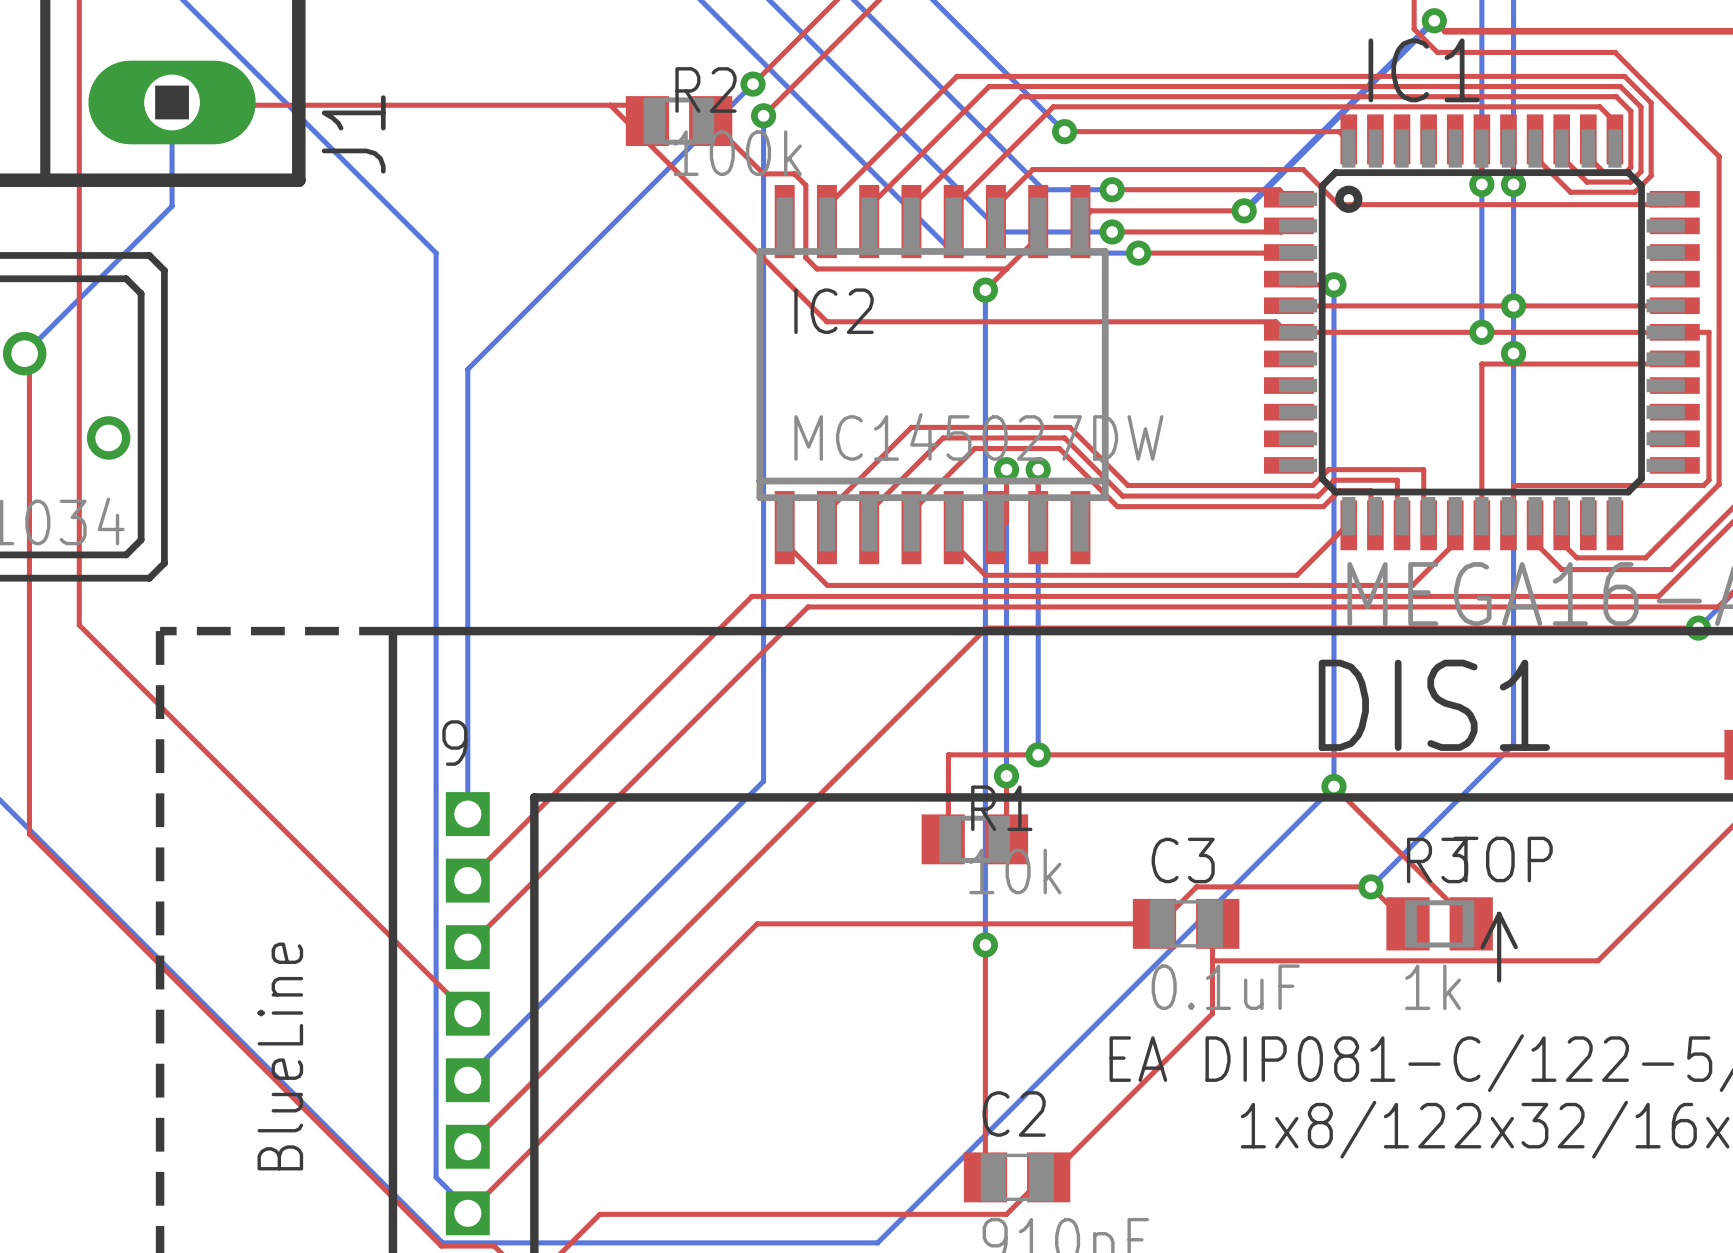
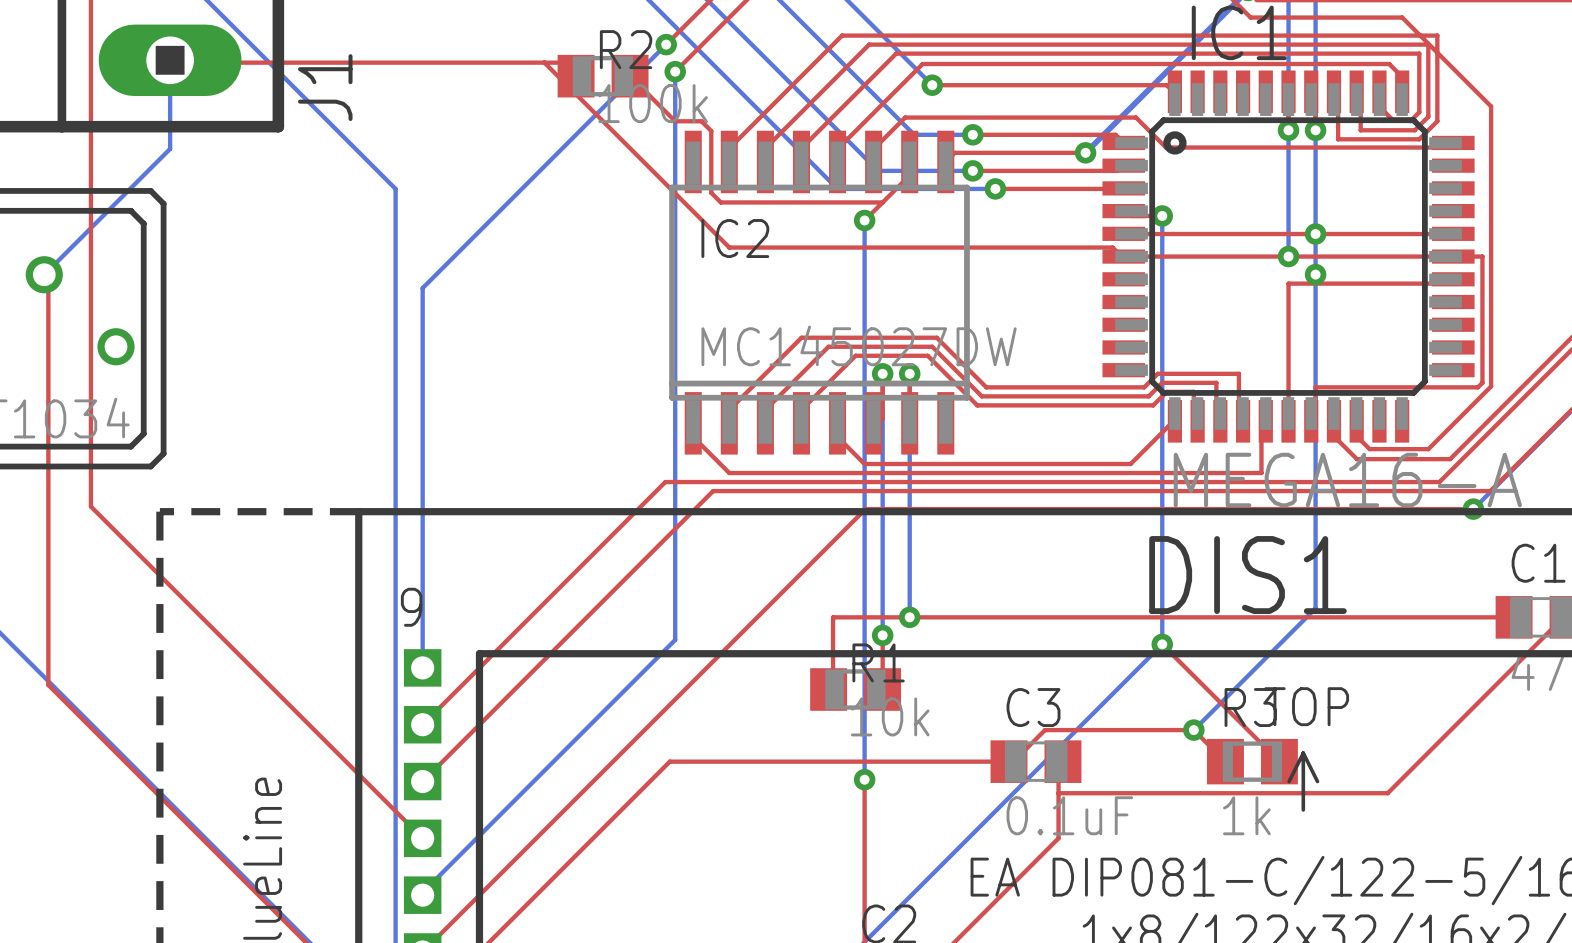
top track: (1539, 161) (1570, 192) (1634, 192) (1651, 175) (1651, 102) (1624, 76) (957, 76) (826, 206) -> (1338, 110) (1338, 139) (1419, 139) (1437, 121) (1437, 35) (842, 35) (729, 149)
top track: (1566, 161) (1586, 182) (1630, 182) (1641, 171) (1641, 107) (1620, 86) (989, 86) (869, 206) -> (1360, 110) (1360, 130) (1414, 130) (1428, 116) (1428, 44) (869, 44) (765, 149)
top track: (1630, 167) (1630, 111) (1616, 96) (1021, 96) (911, 206) -> (1415, 115) (1419, 112) (1419, 53) (896, 53) (801, 149)
top track: (784, 542) (827, 585) (1412, 585) (1450, 547) -> (693, 436) (729, 473) (1261, 473) (1261, 440)

